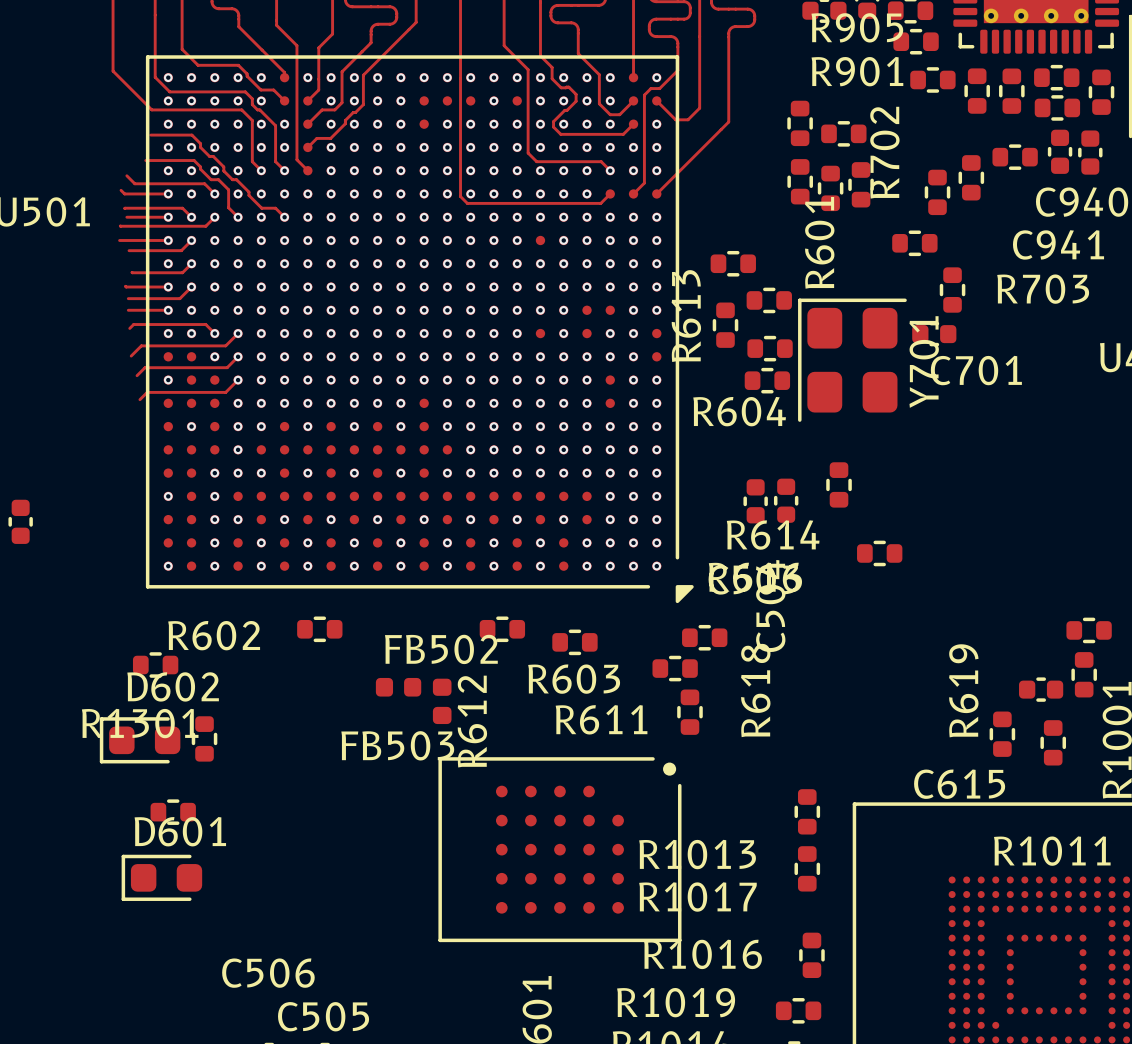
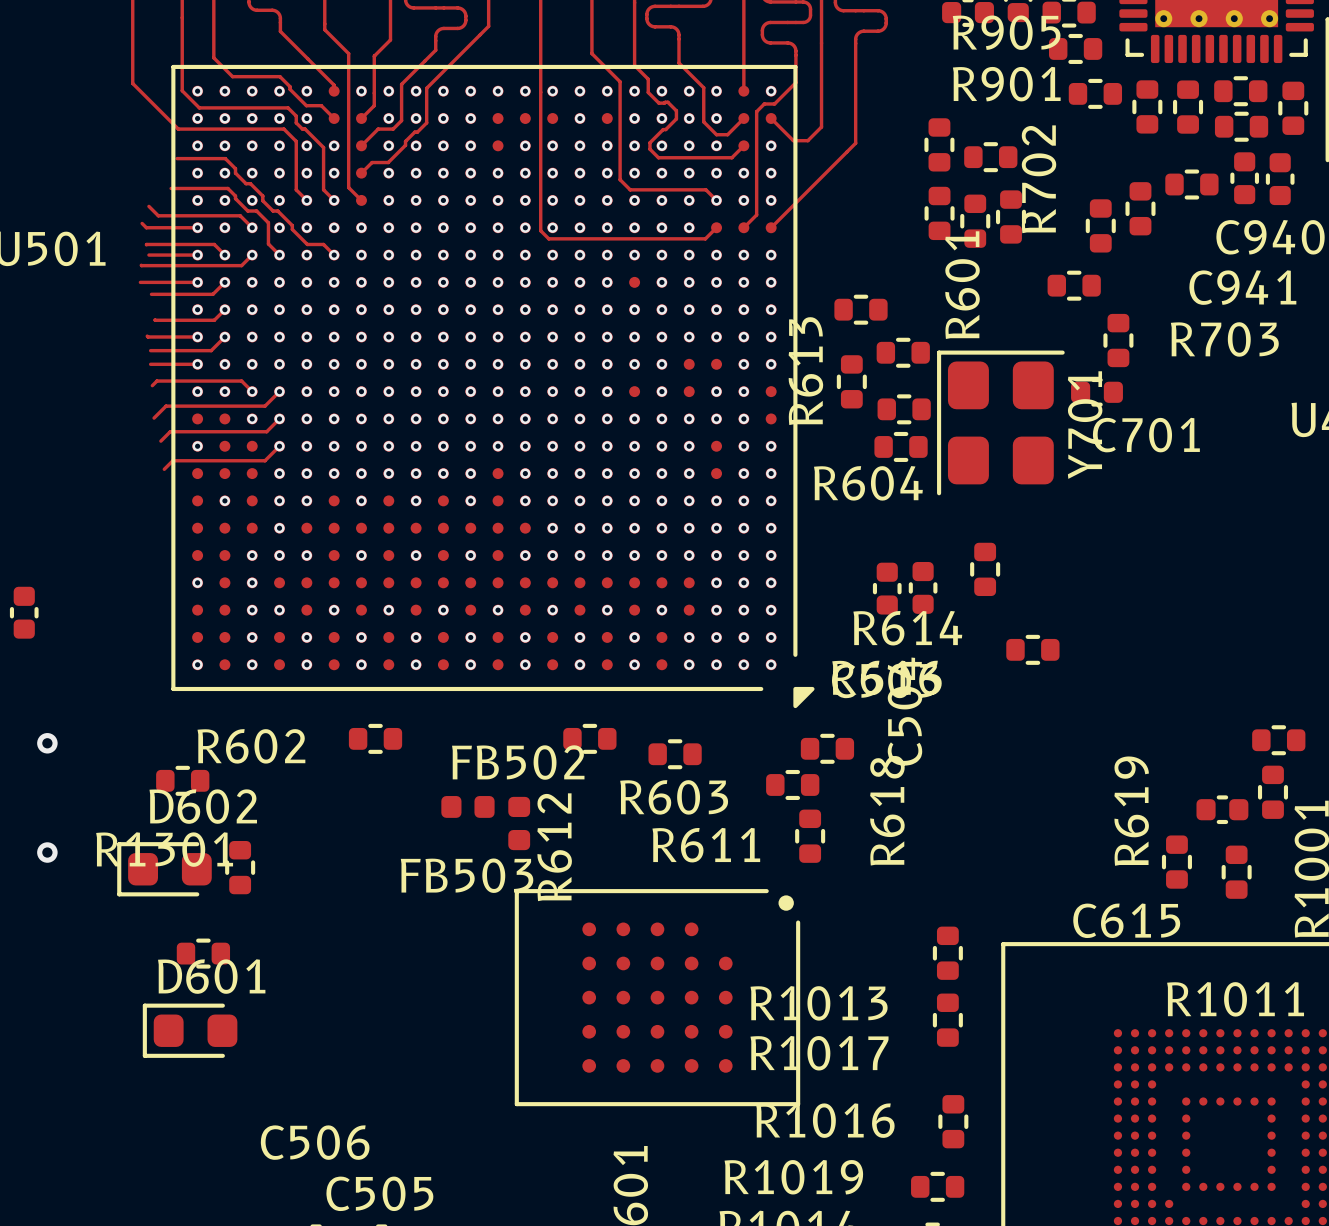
via: none -> (47, 743)
via: none -> (47, 852)

